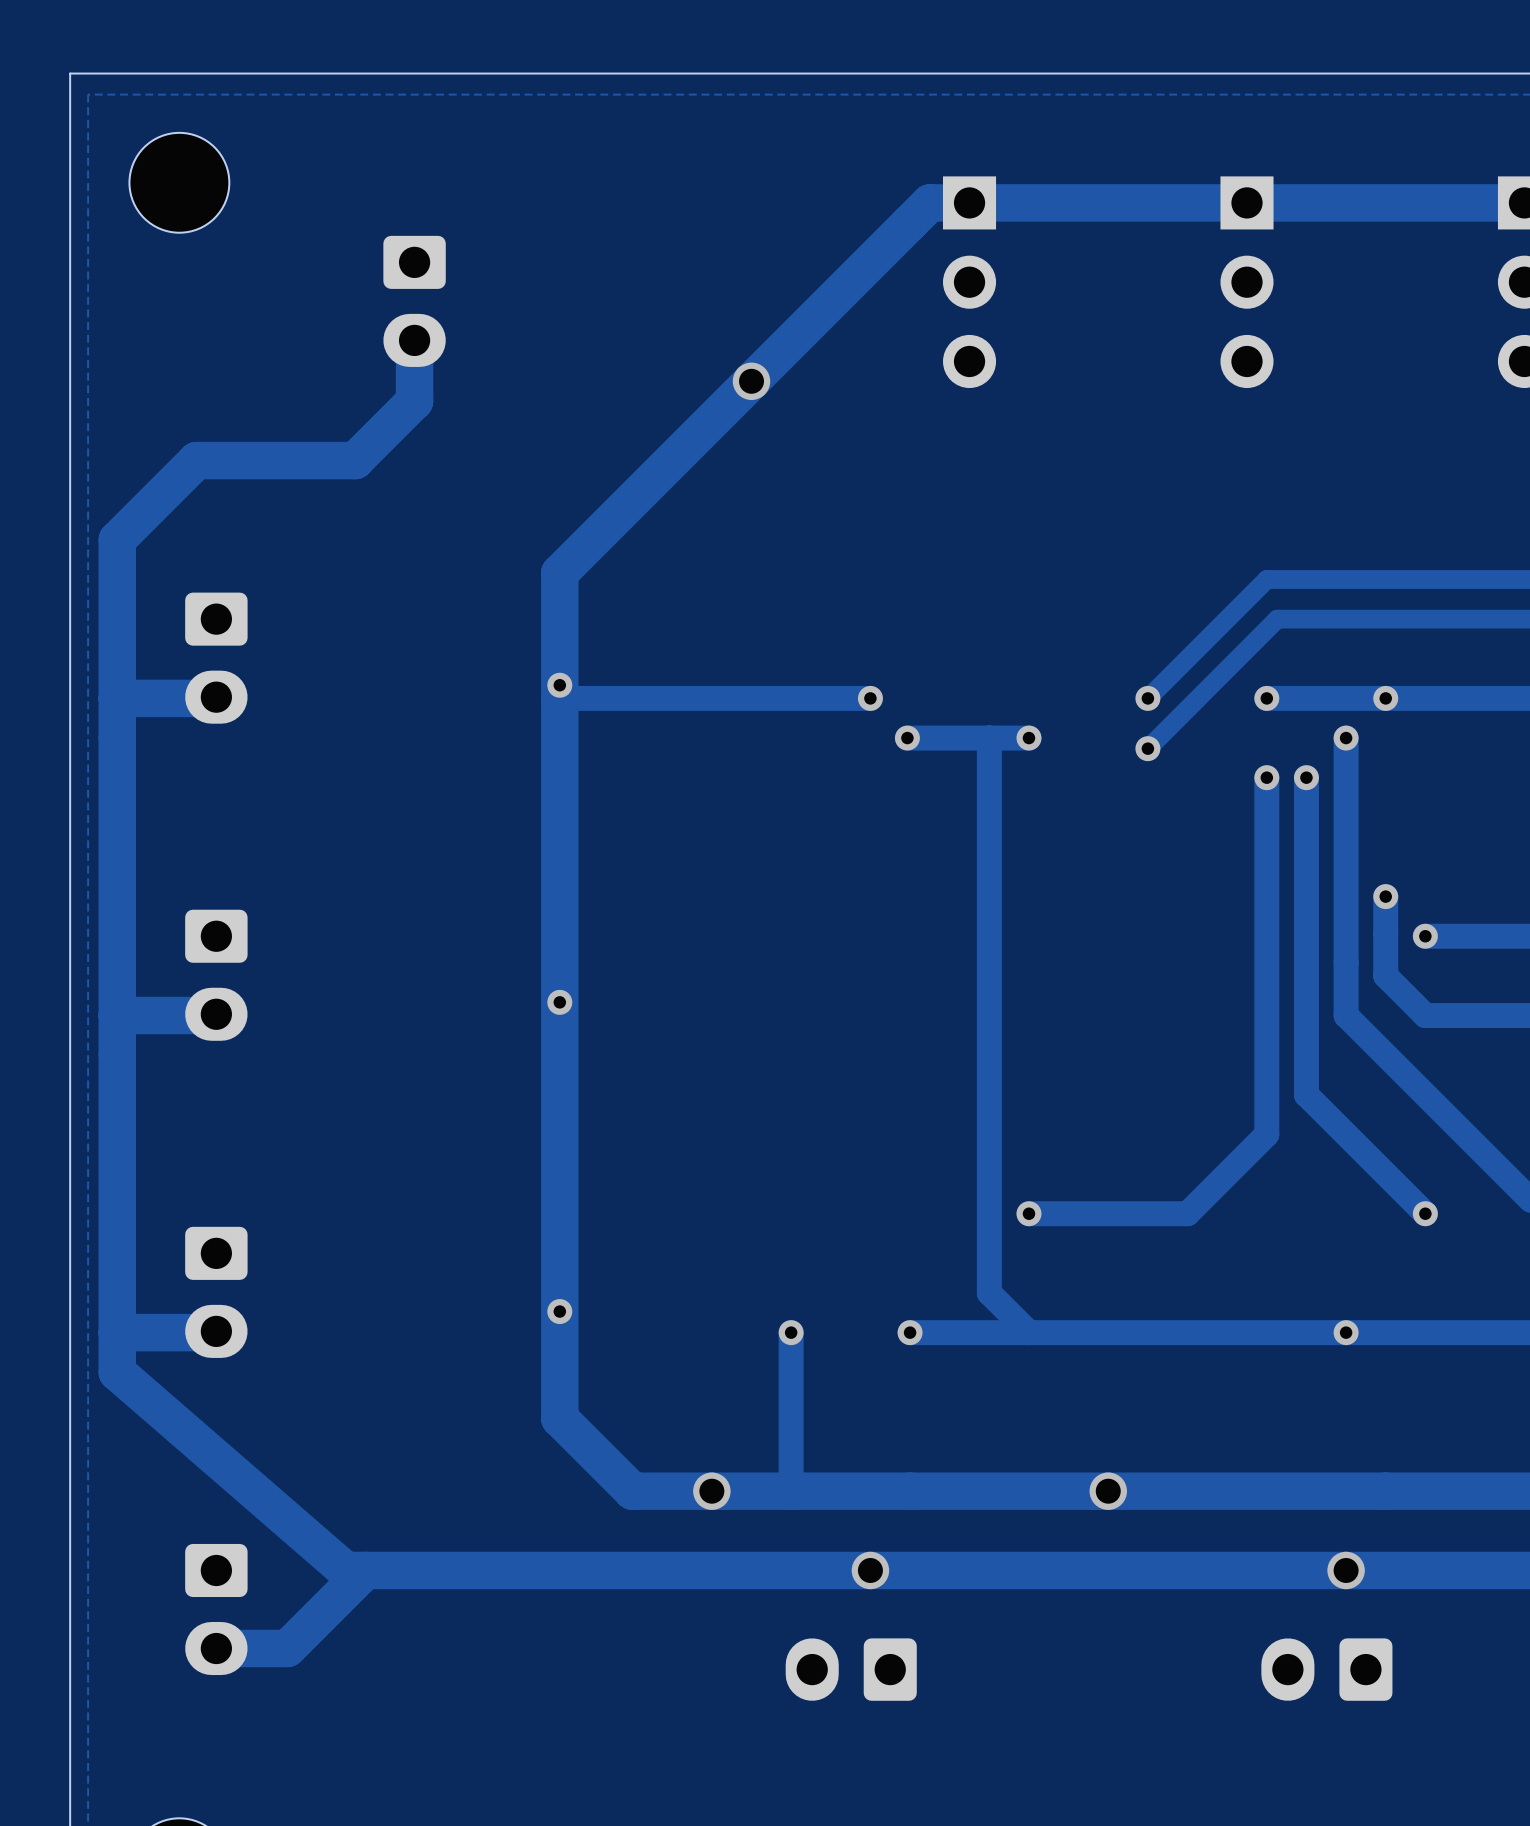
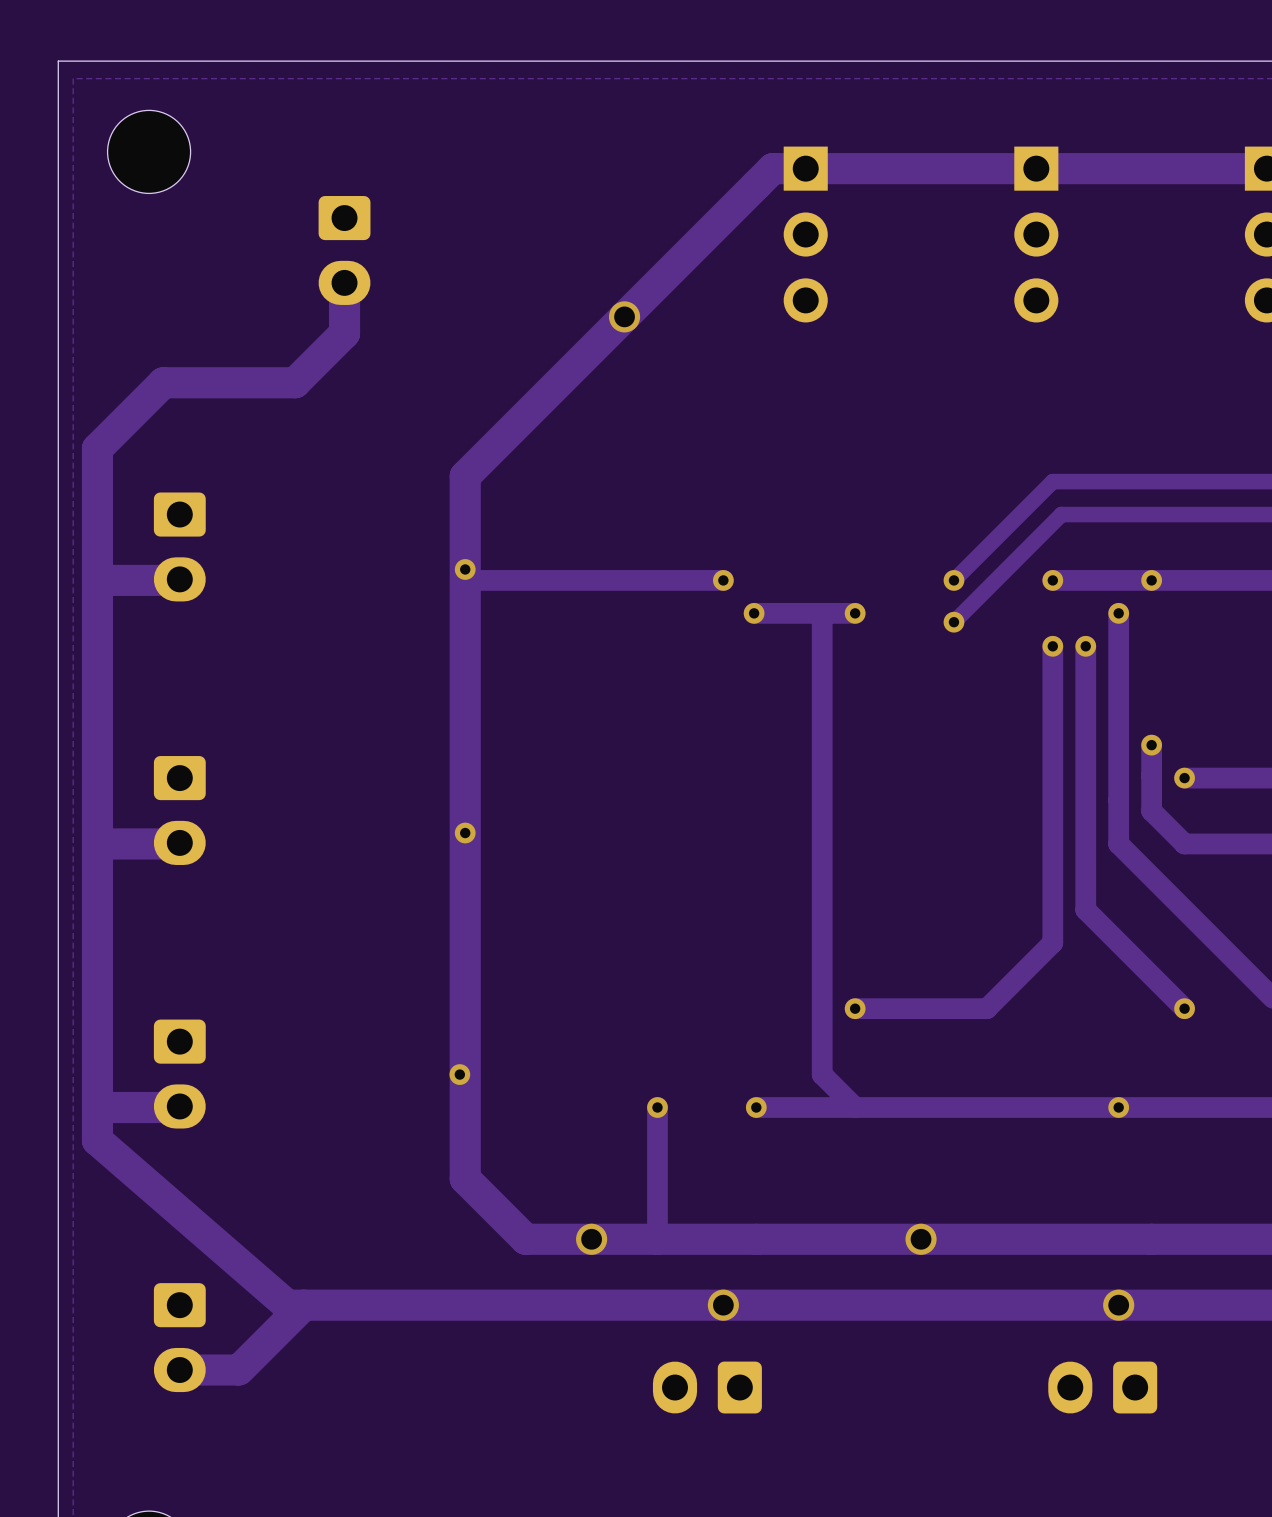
via position: (559, 1311) -> (459, 1074)

